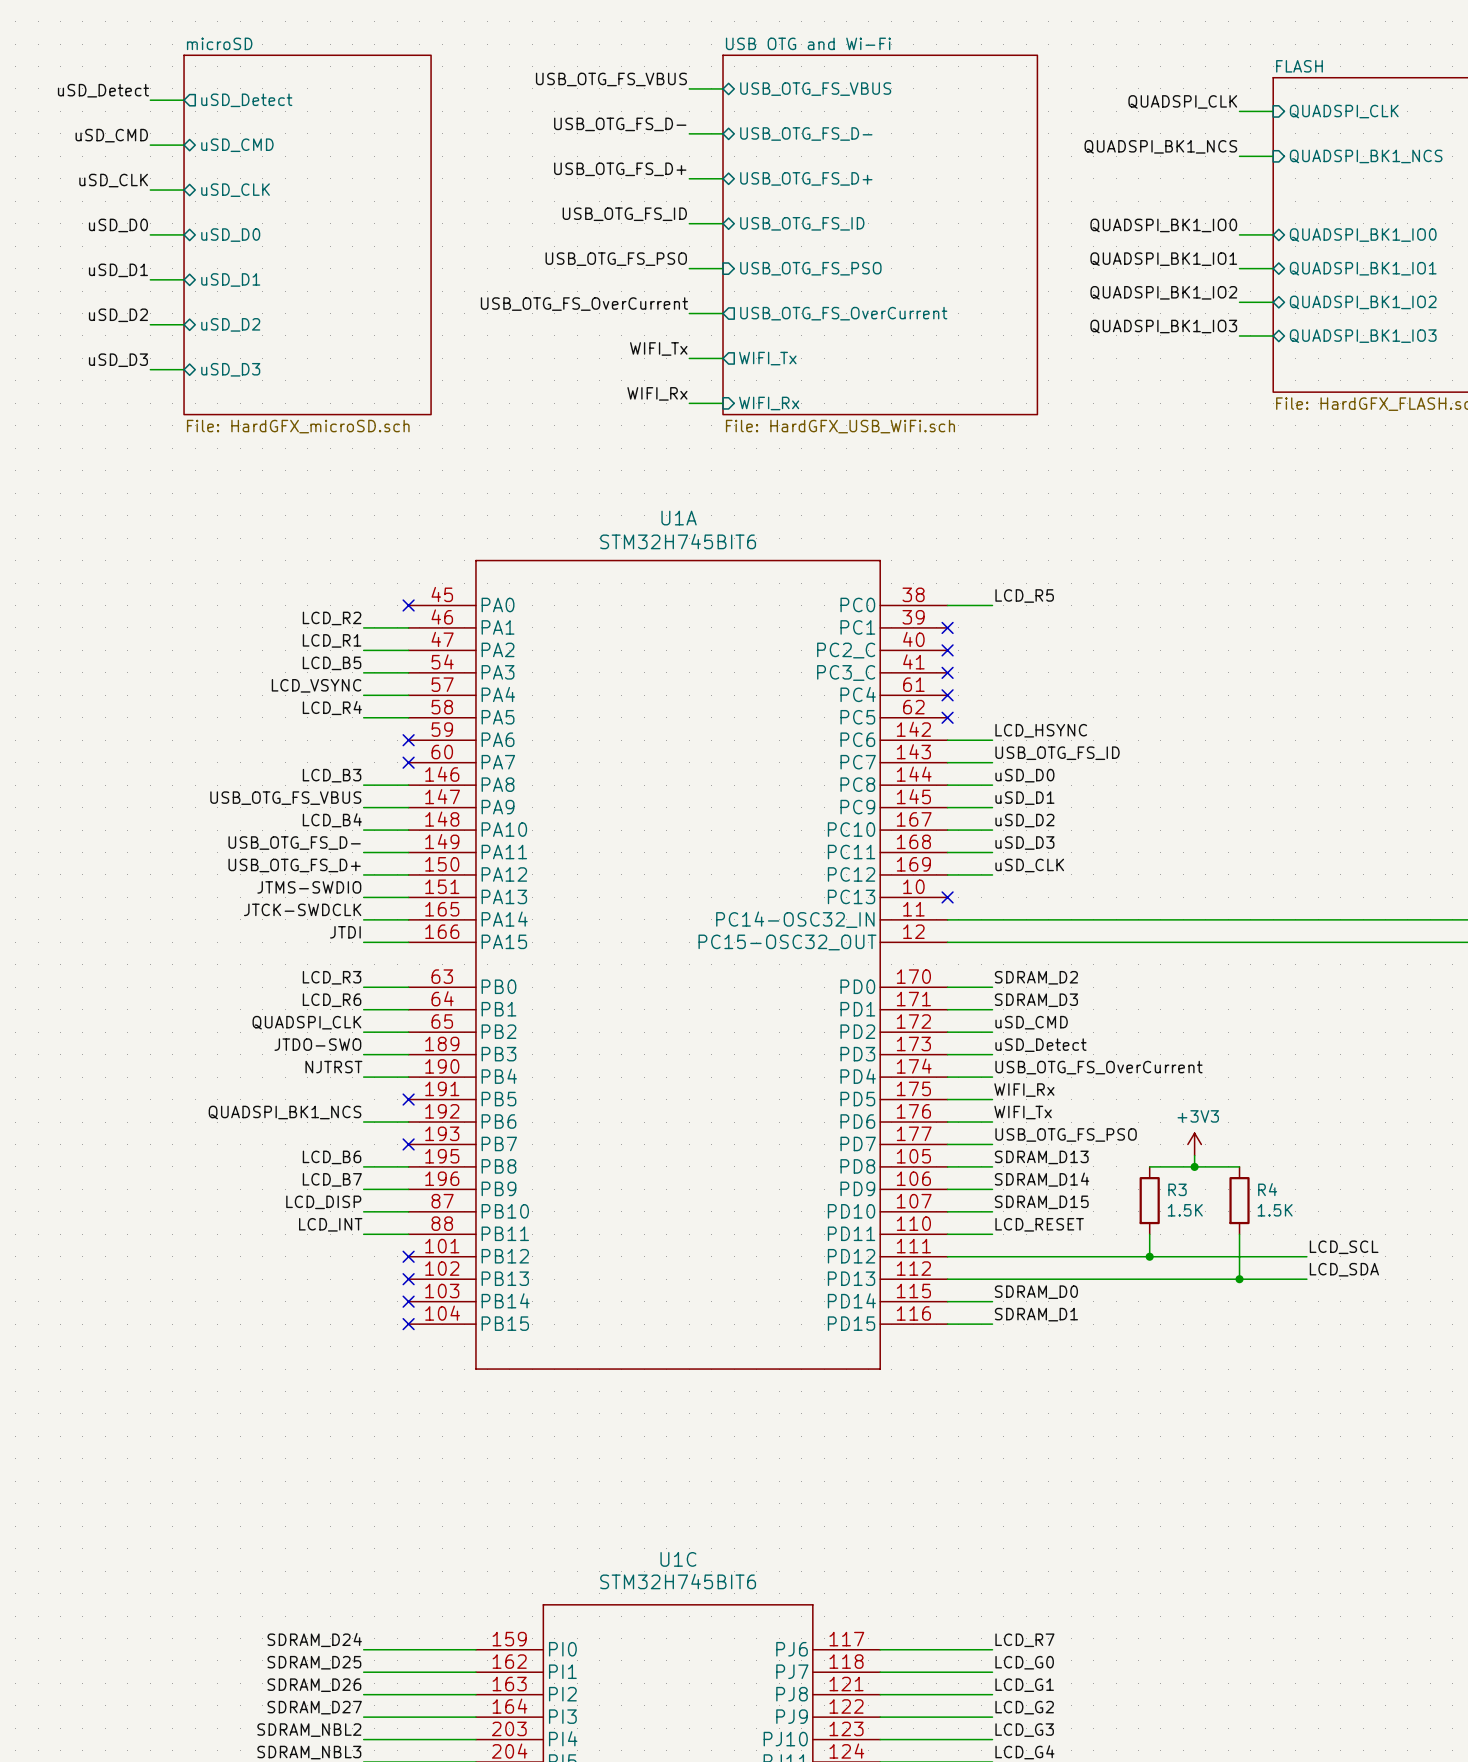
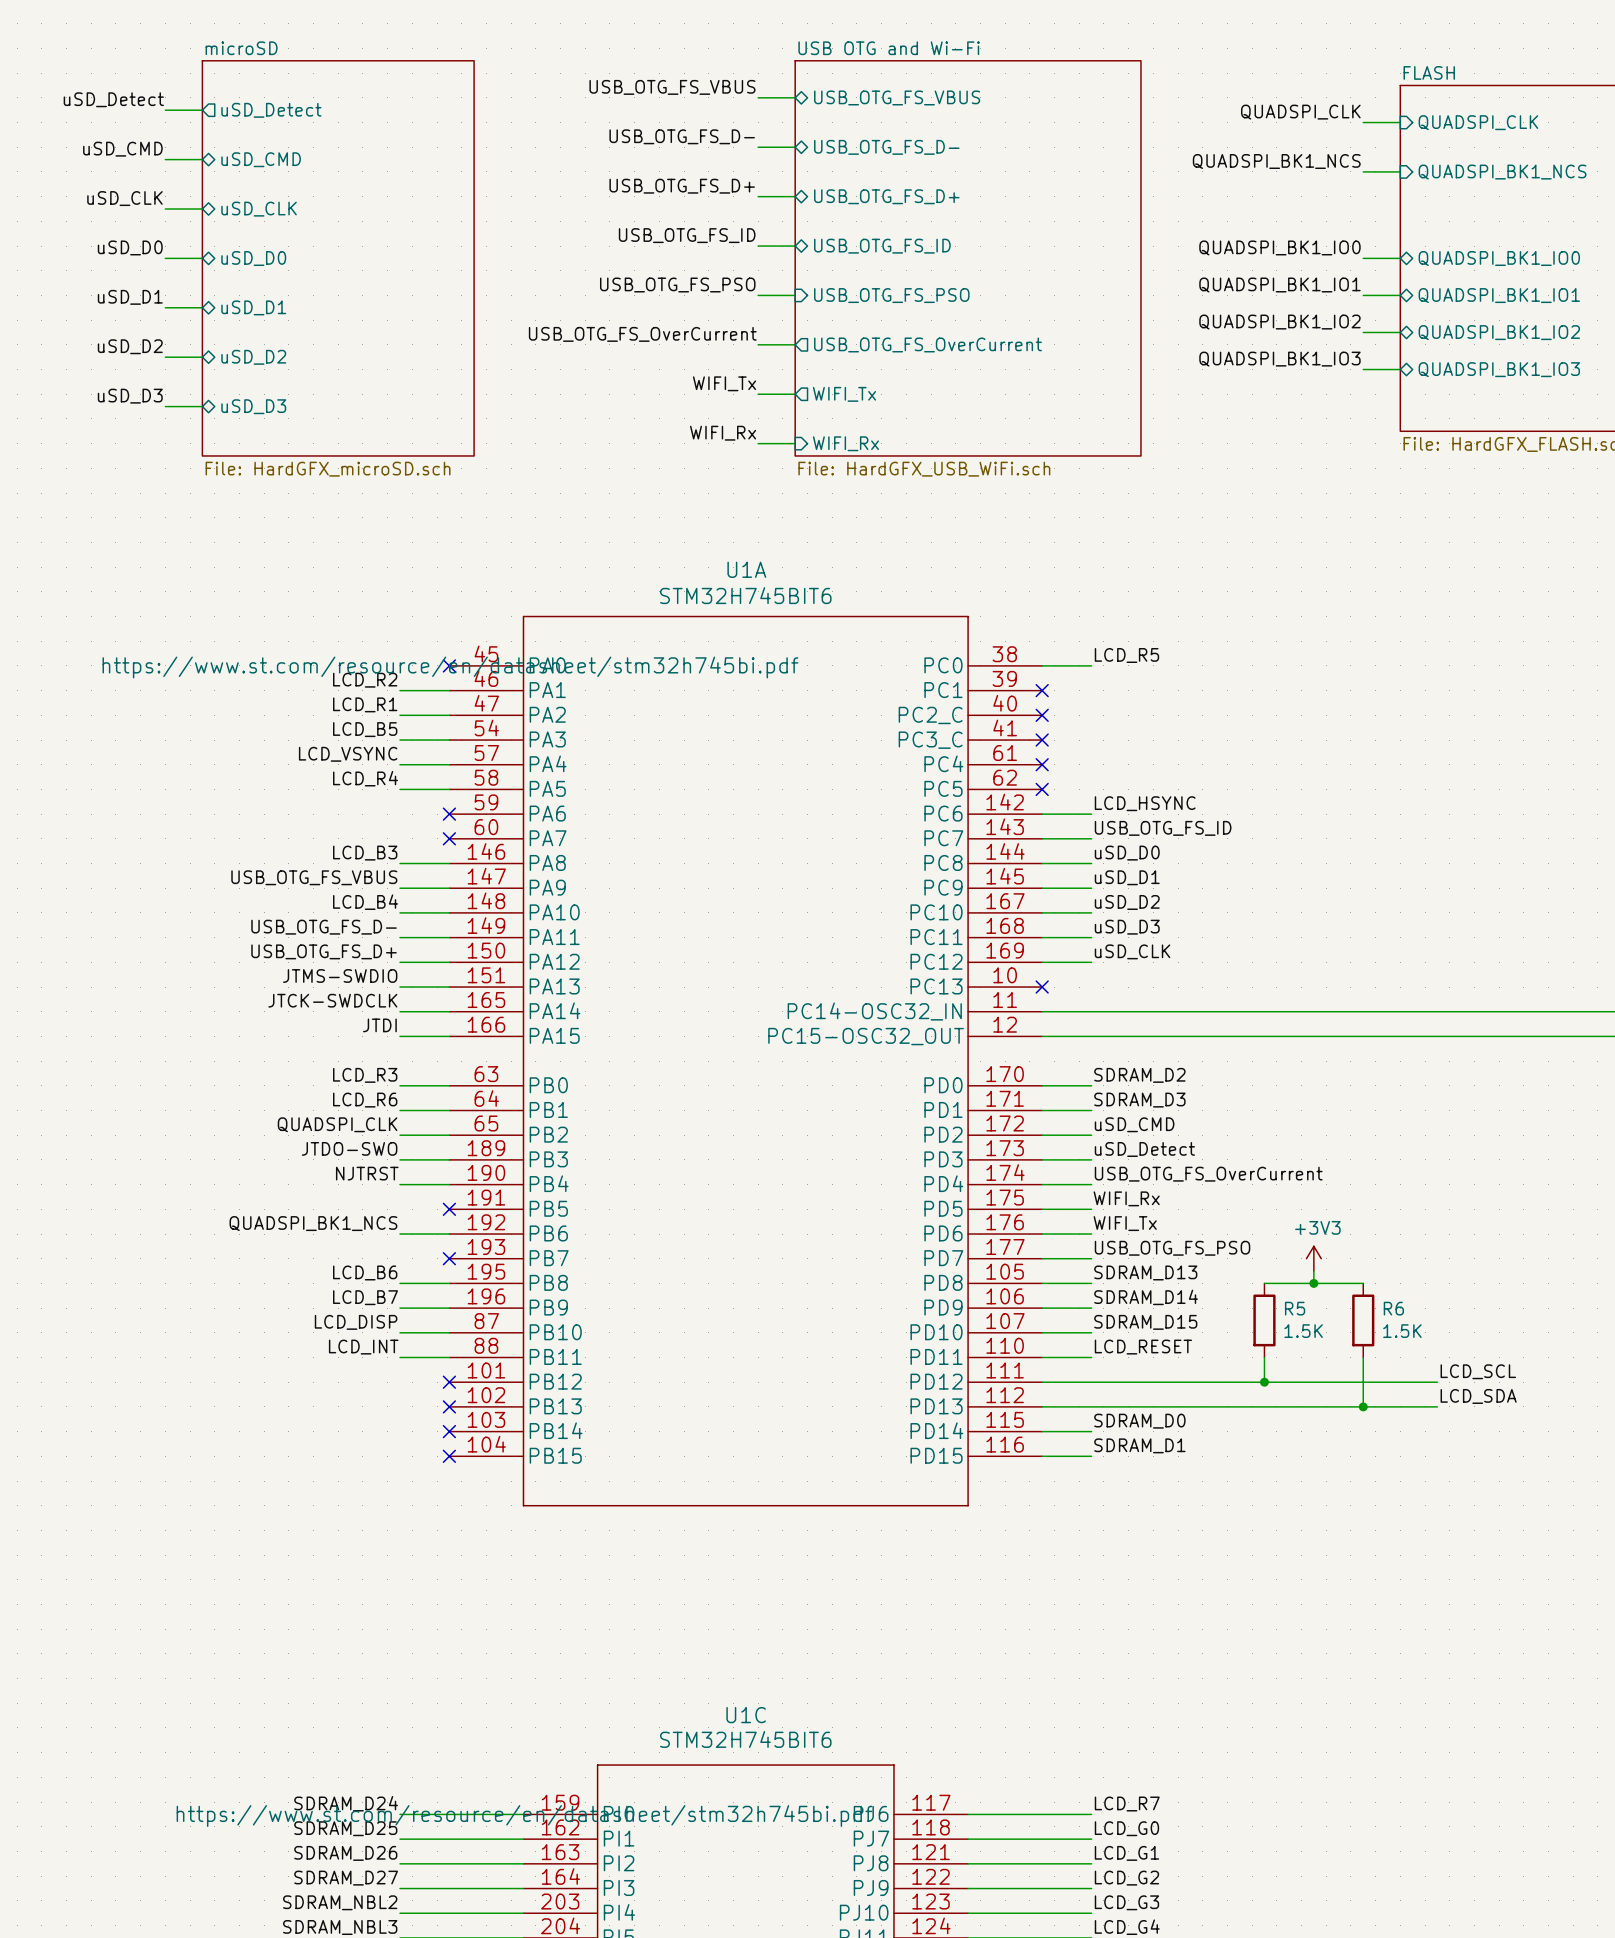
U1A text: none -> https://www.st.com/resource/en/datasheet/stm32h745bi.pdf (450, 667)
R3 name: R3 (1177, 1189) -> R5 (1295, 1308)
R4 name: R4 (1267, 1189) -> R6 (1393, 1308)
U1C text: none -> https://www.st.com/resource/en/datasheet/stm32h745bi.pdf (524, 1816)

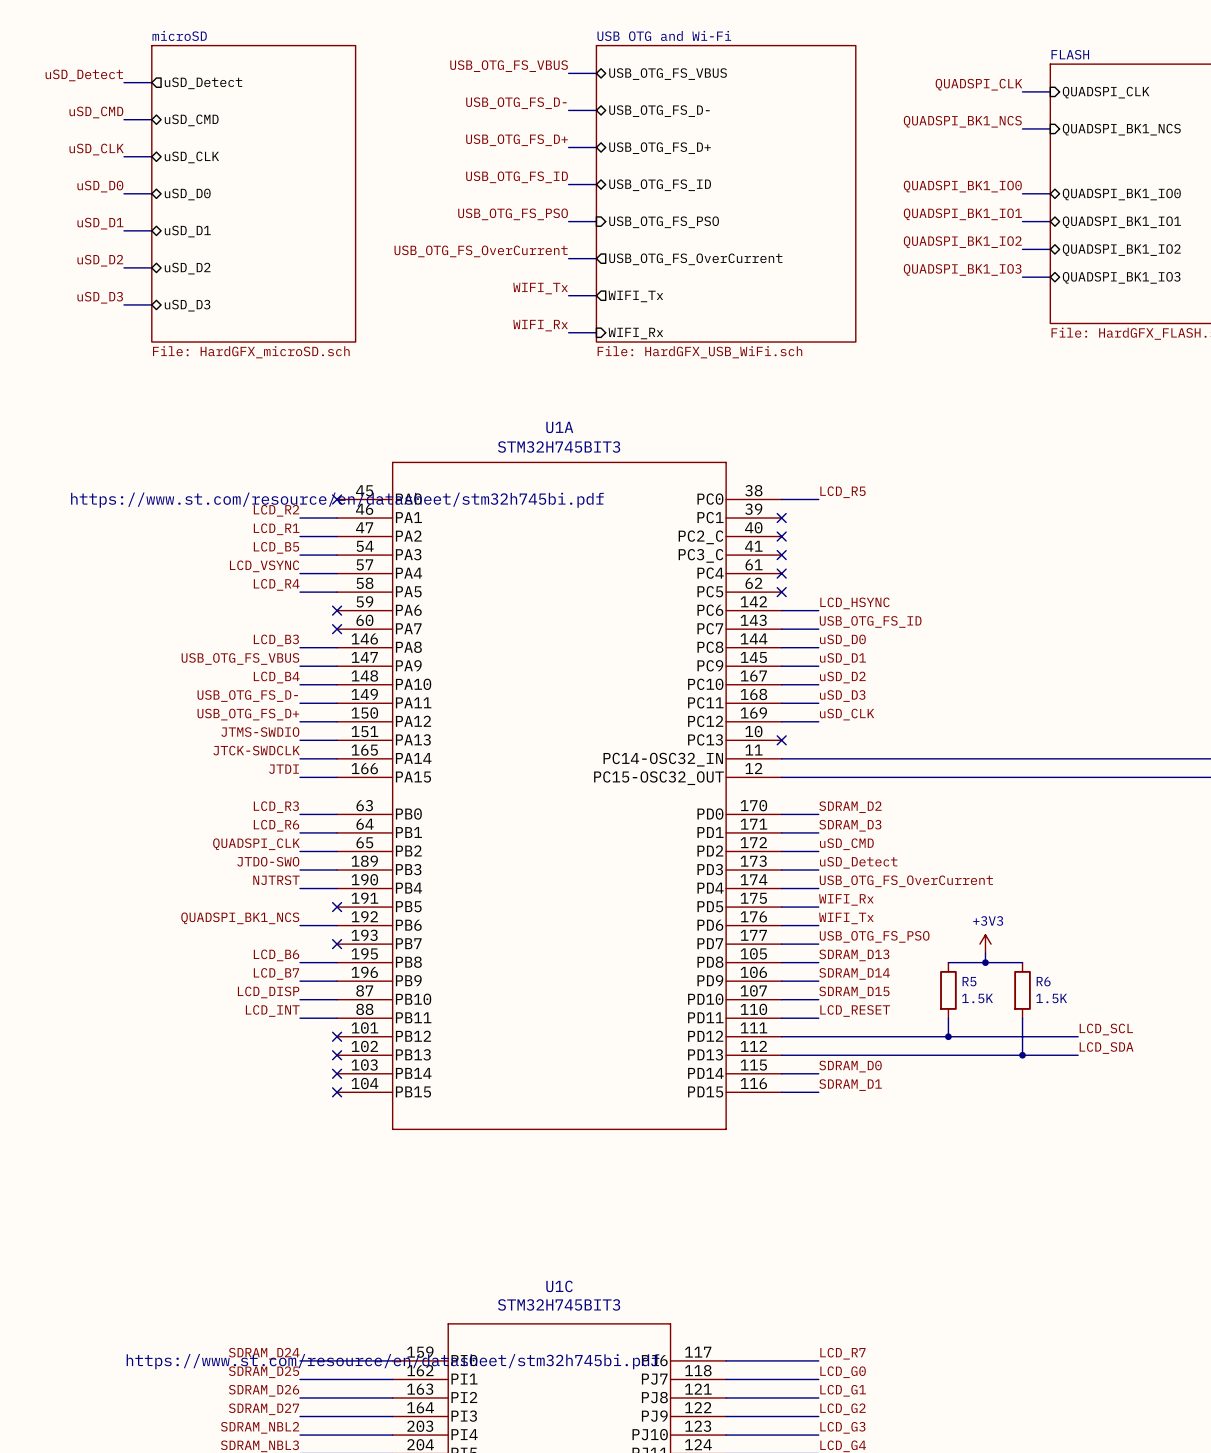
U1A value: STM32H745BIT6 (745, 595) -> STM32H745BIT3 (559, 447)
U1C value: STM32H745BIT6 (745, 1739) -> STM32H745BIT3 (559, 1304)

